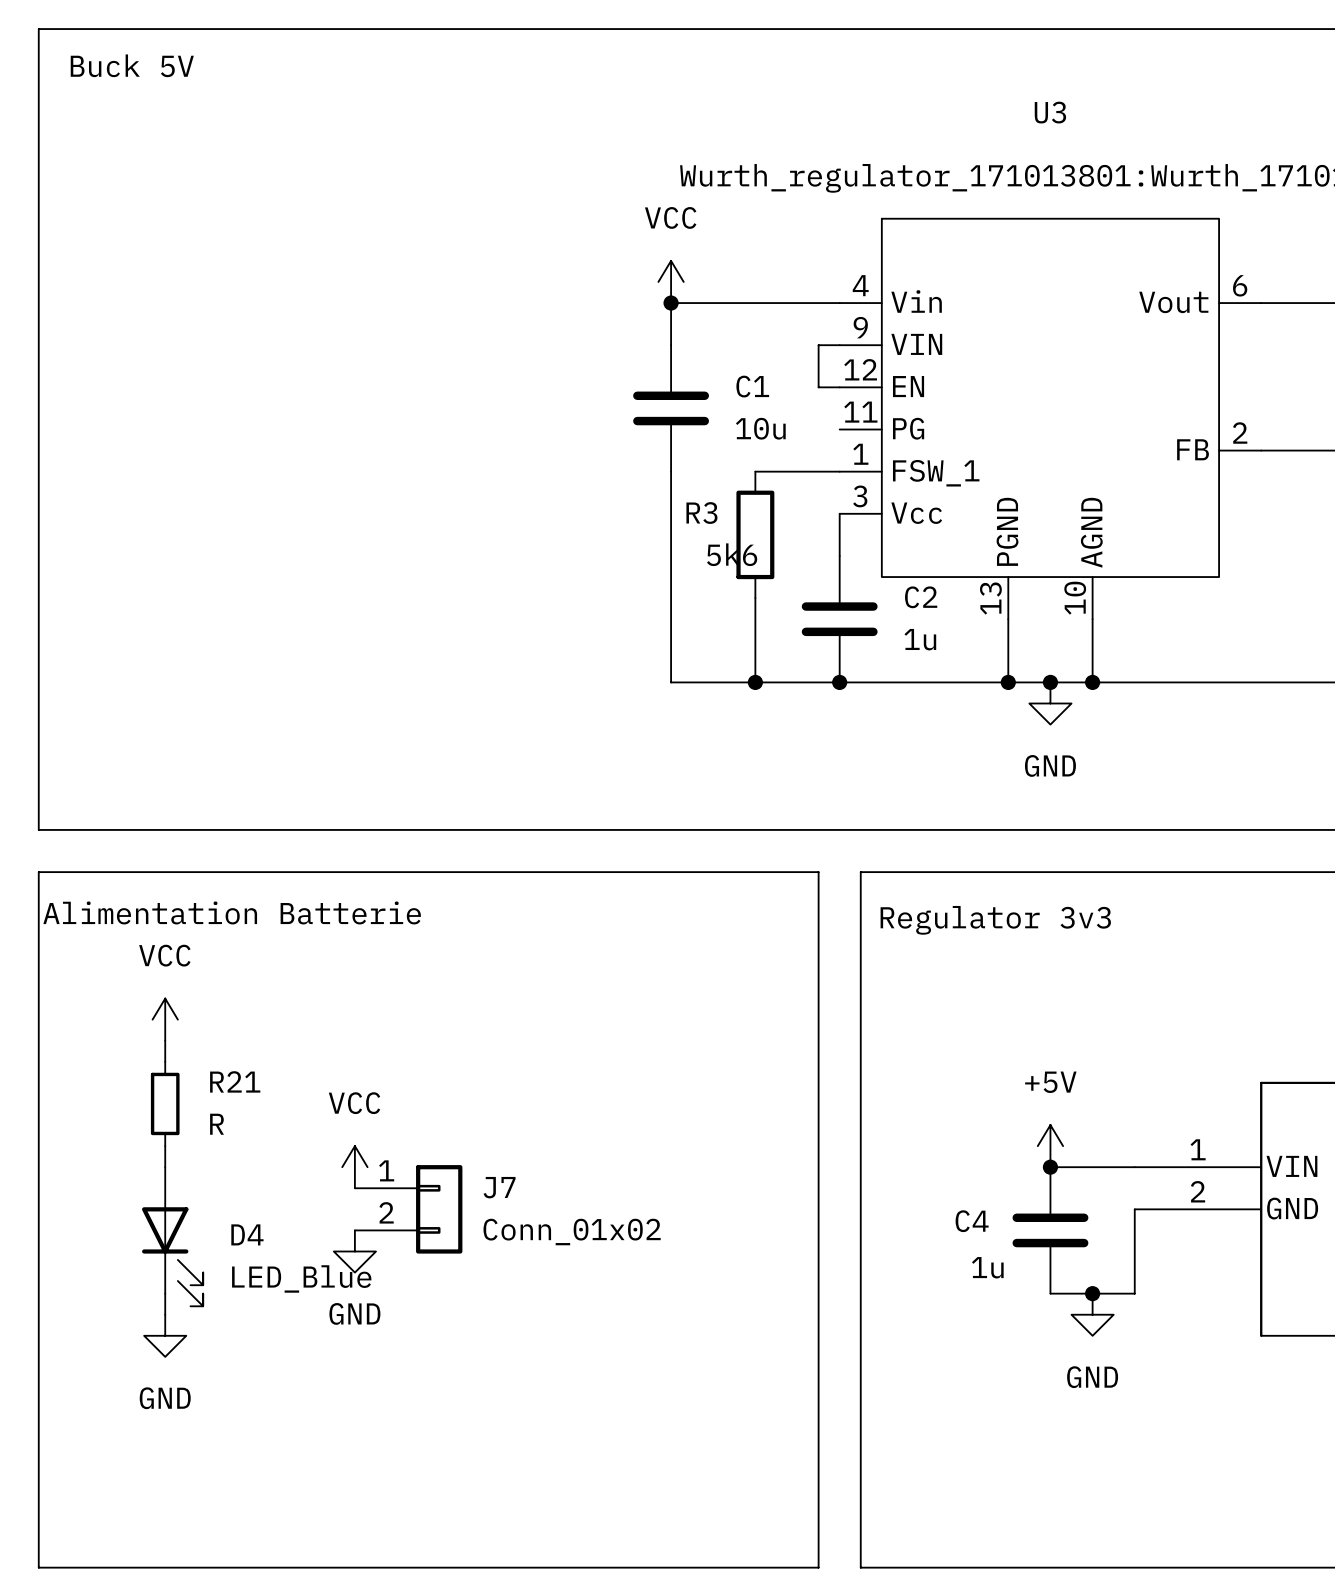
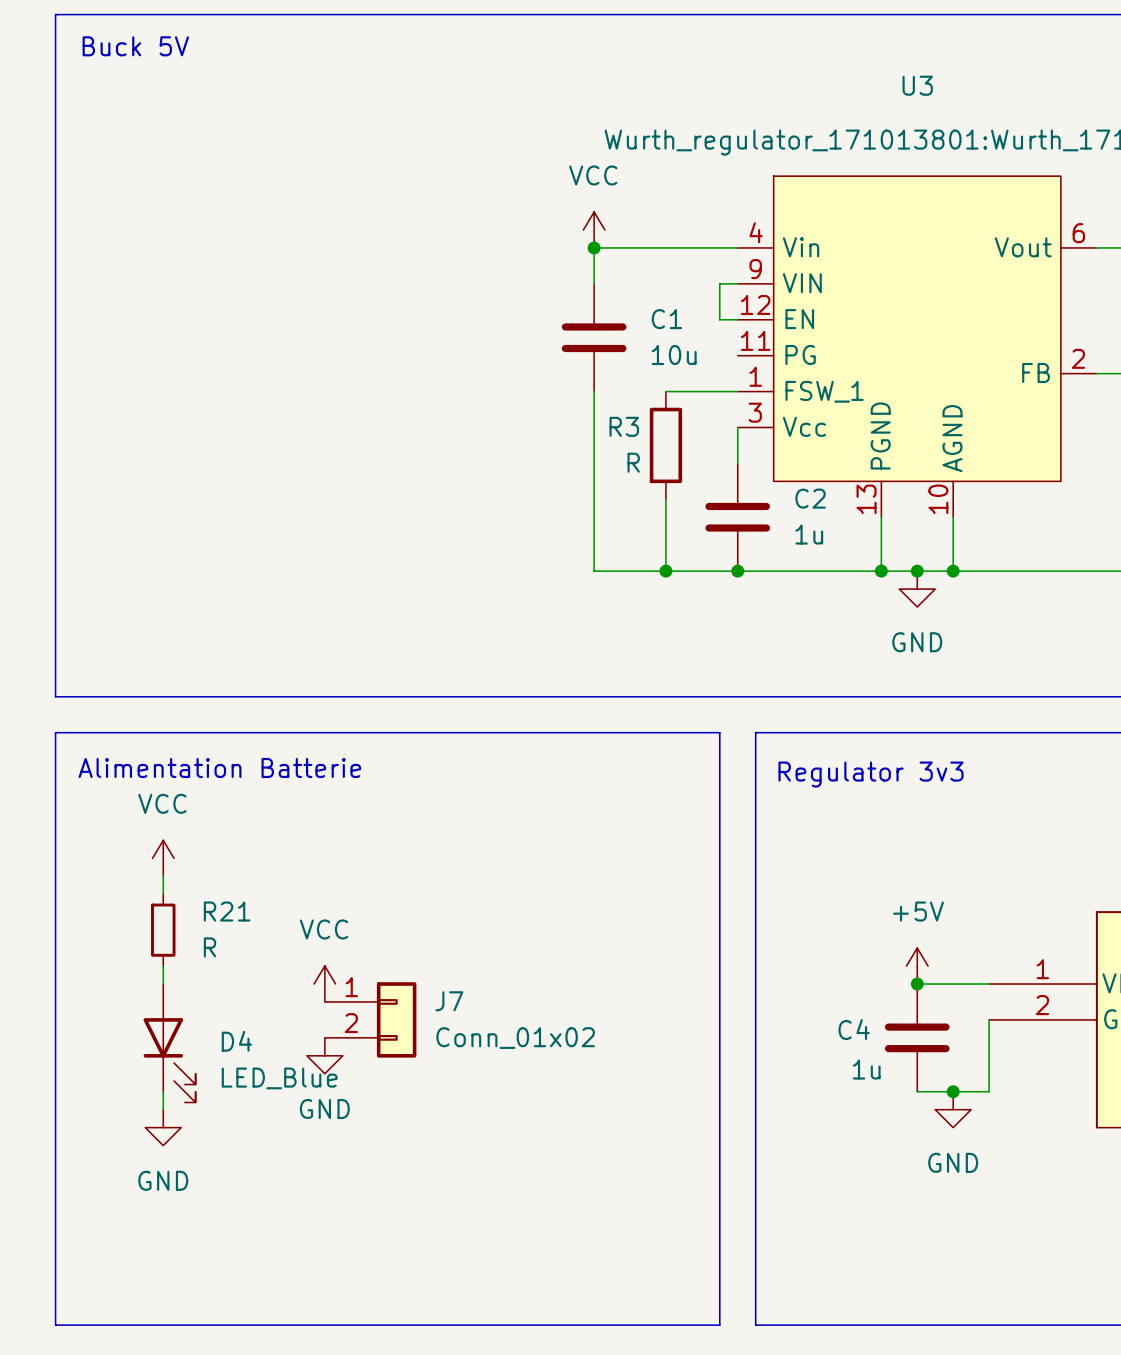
R3 value: 5k6 (732, 554) -> R (633, 462)

